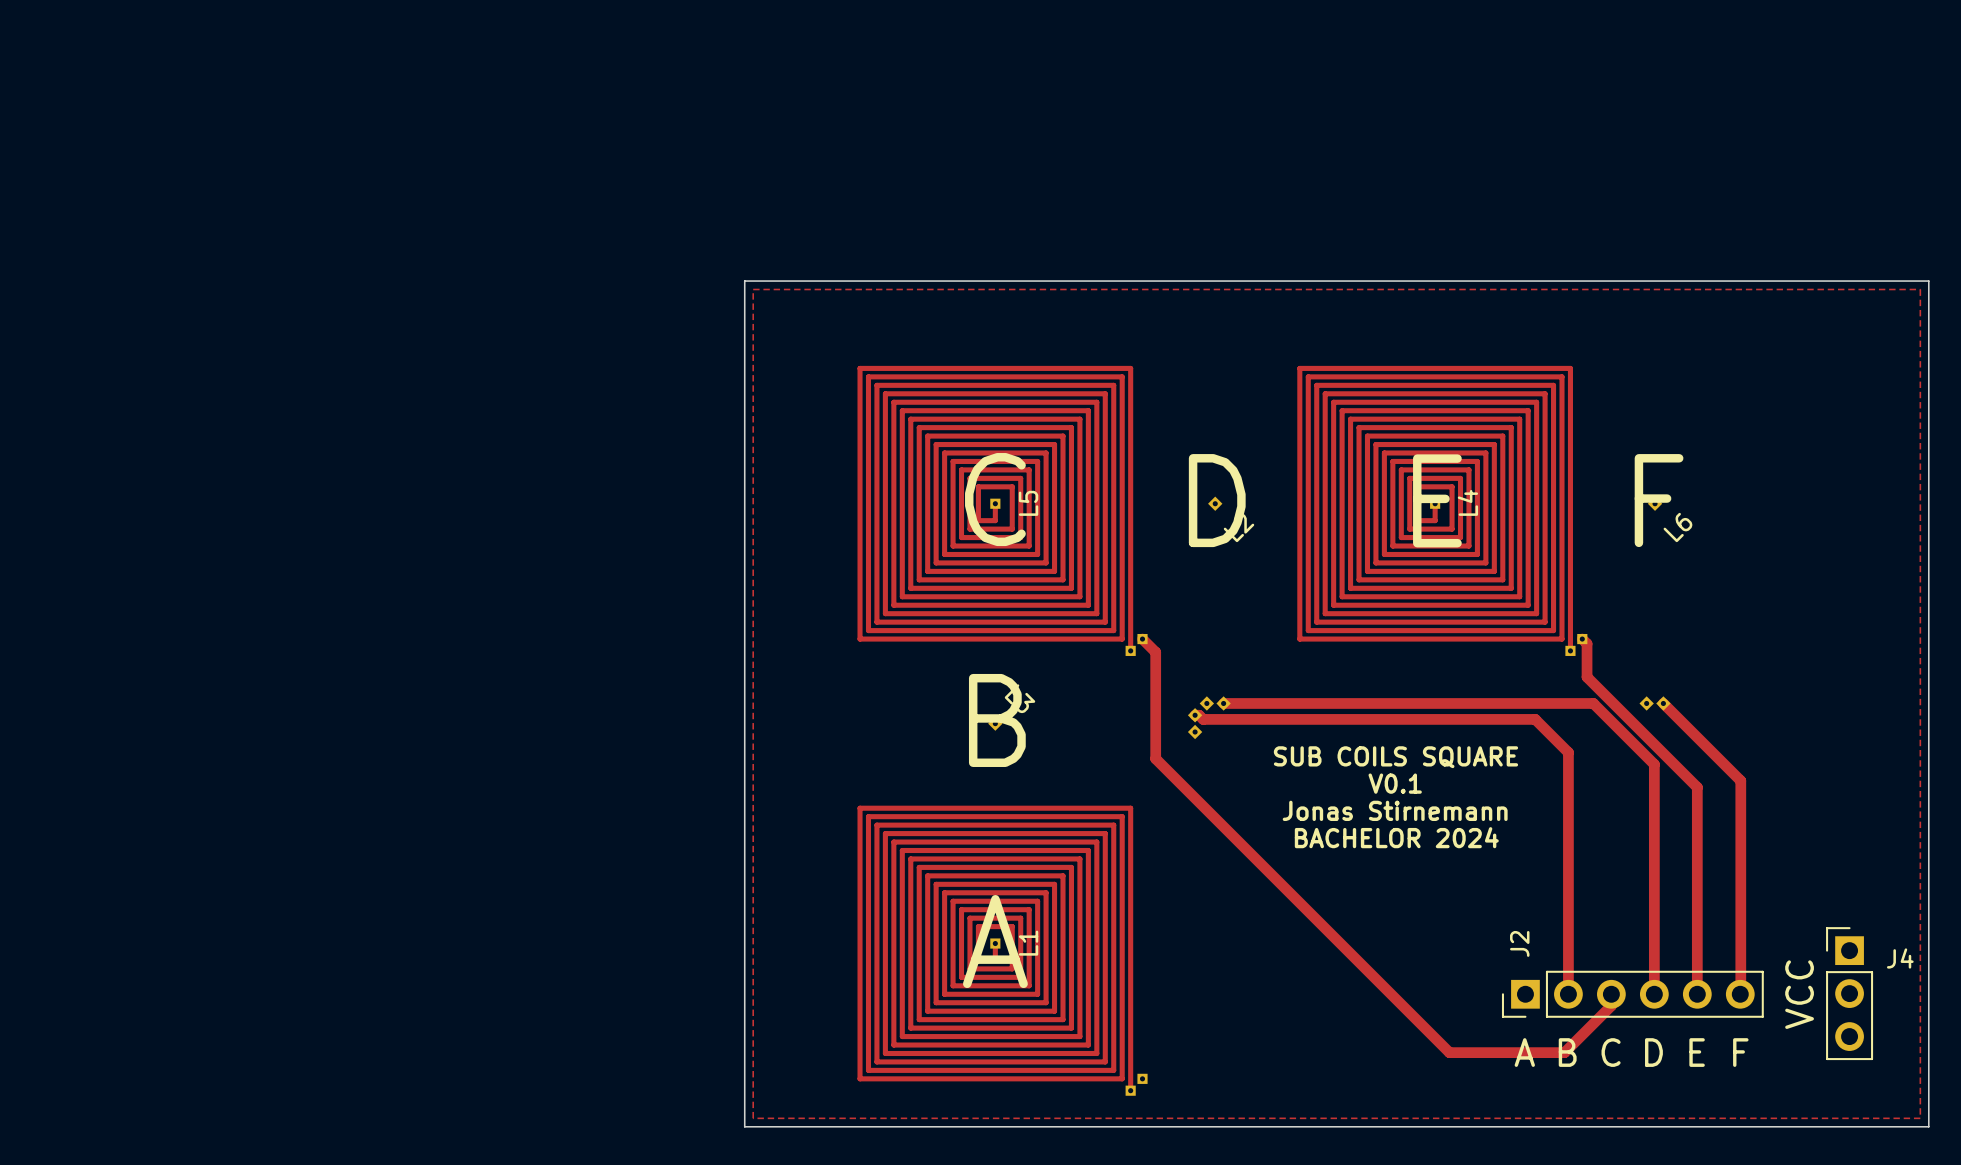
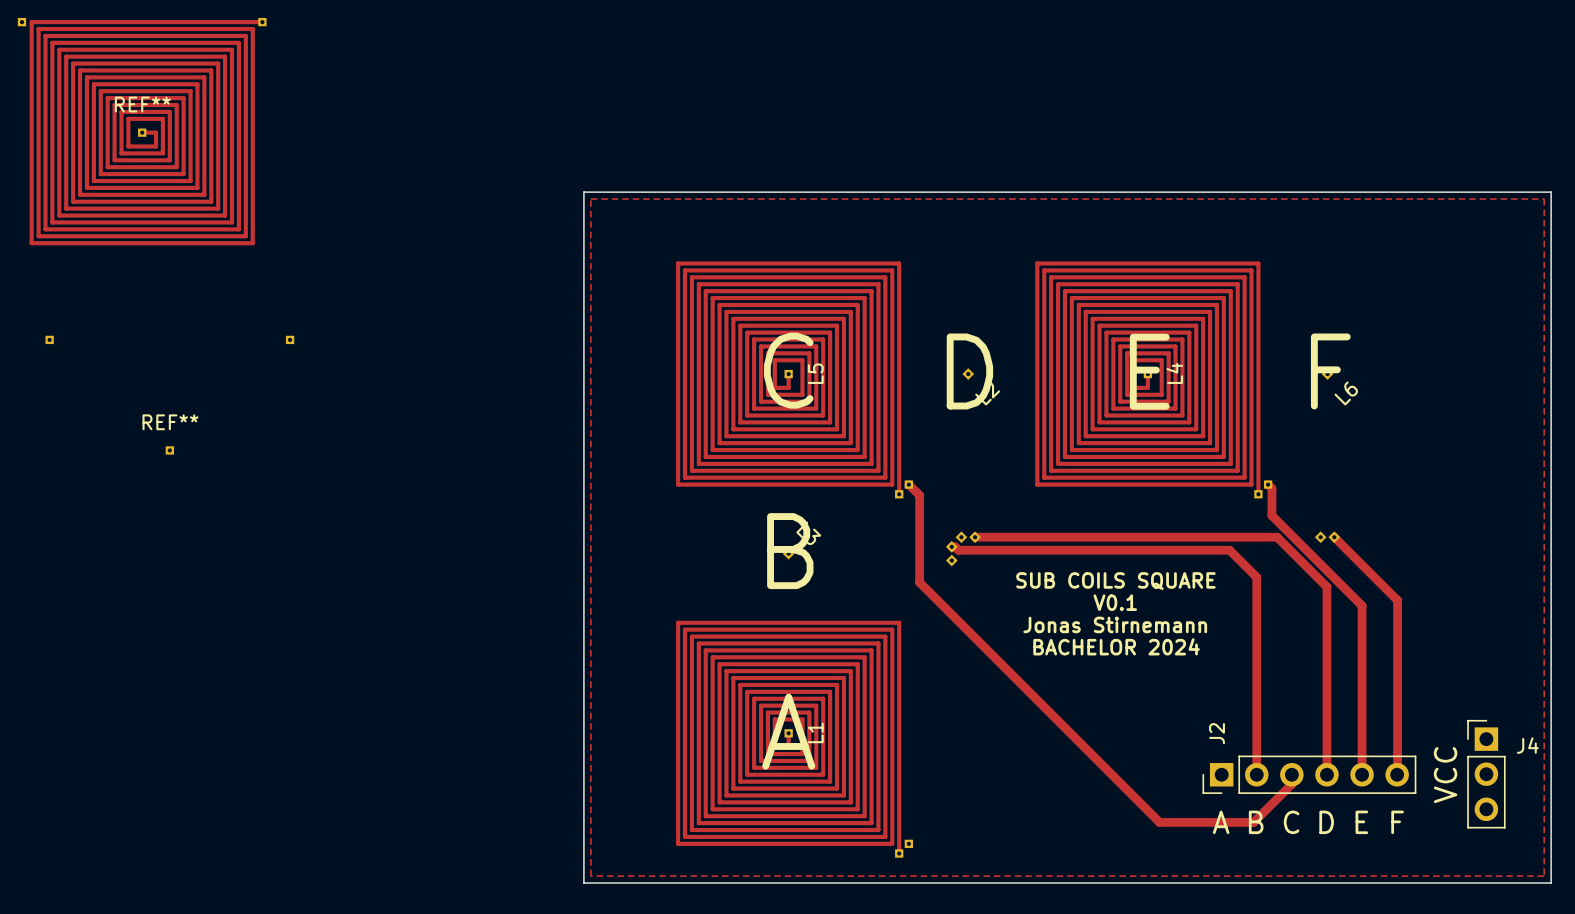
REF**: none -> (142, 131)
REF**: none -> (169, 395)

